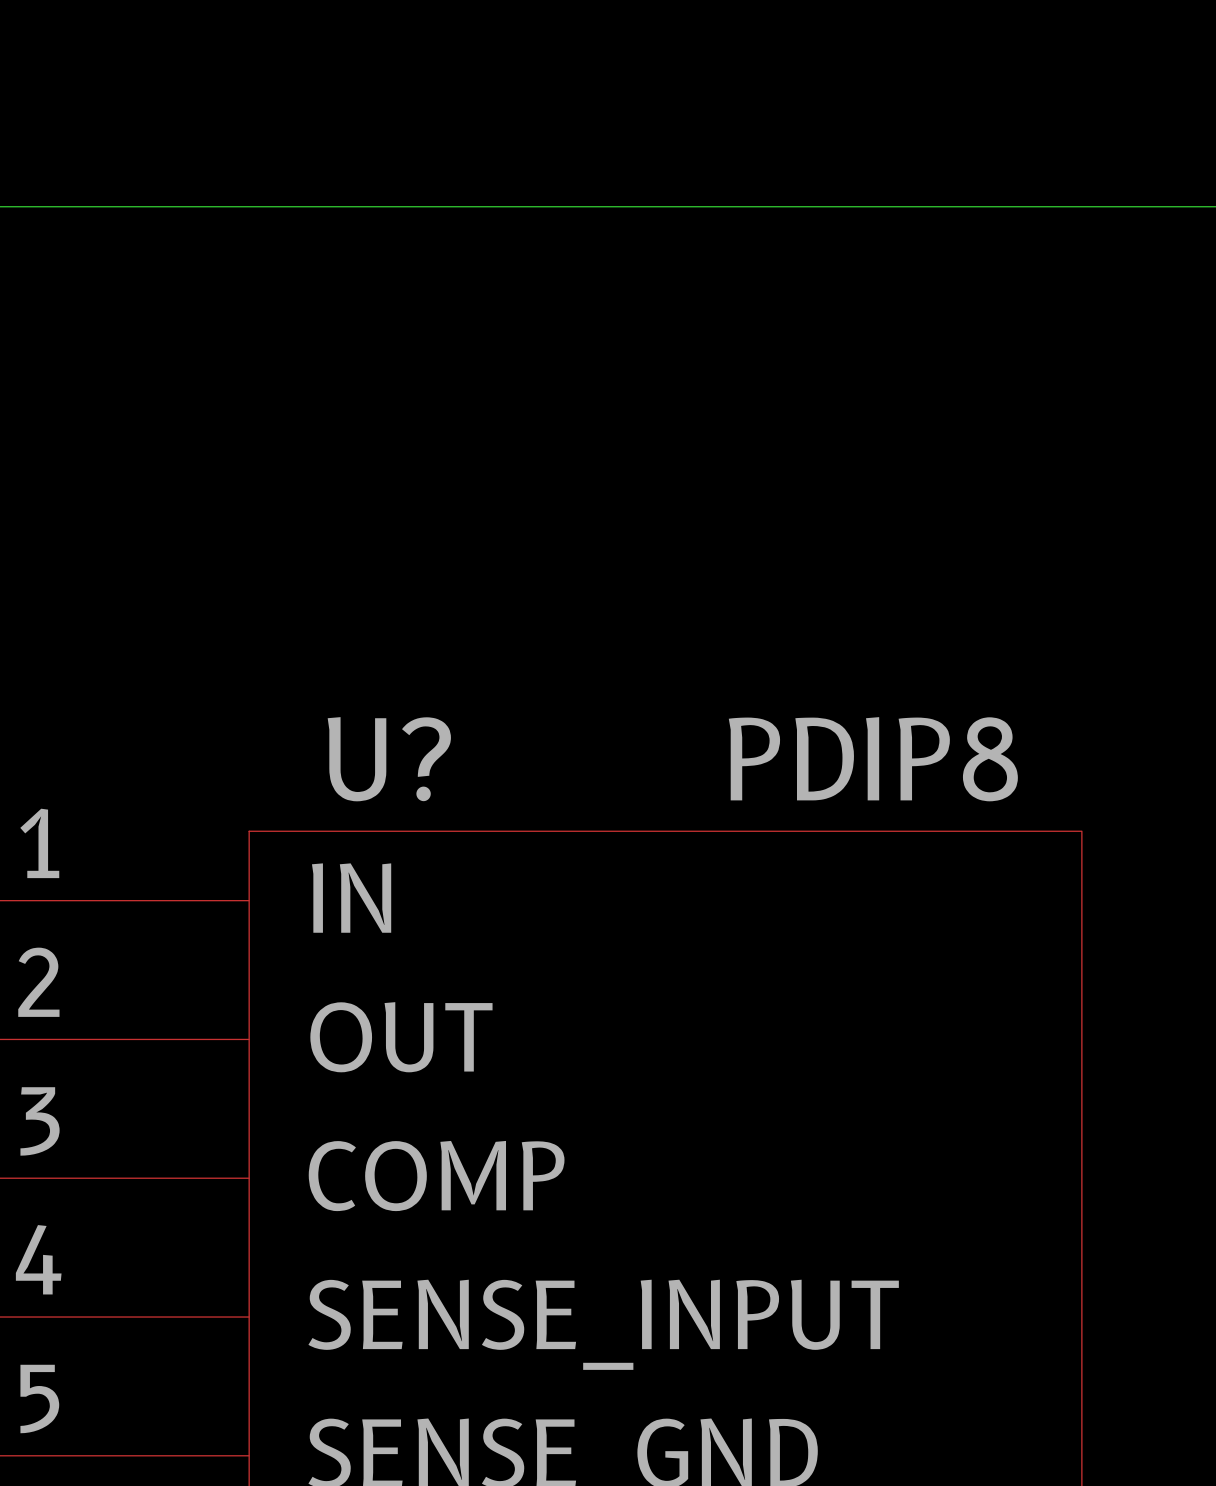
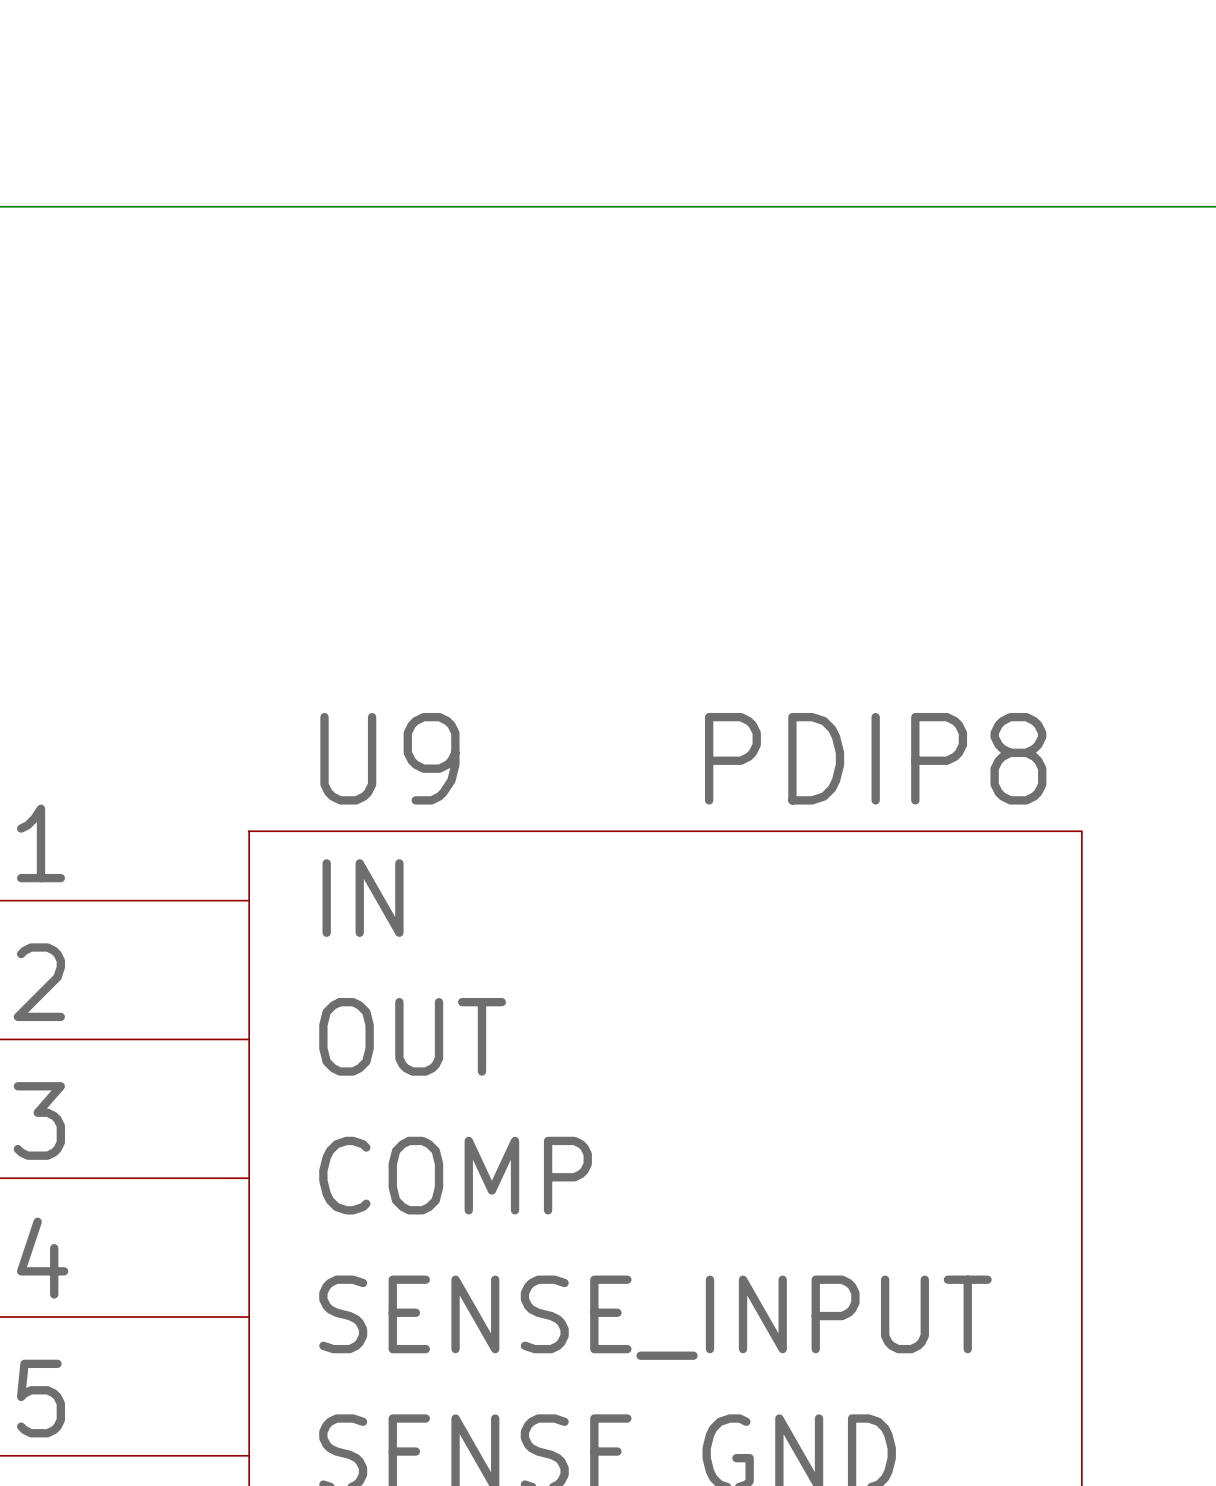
U? name: U? (389, 759) -> U9 (389, 758)

